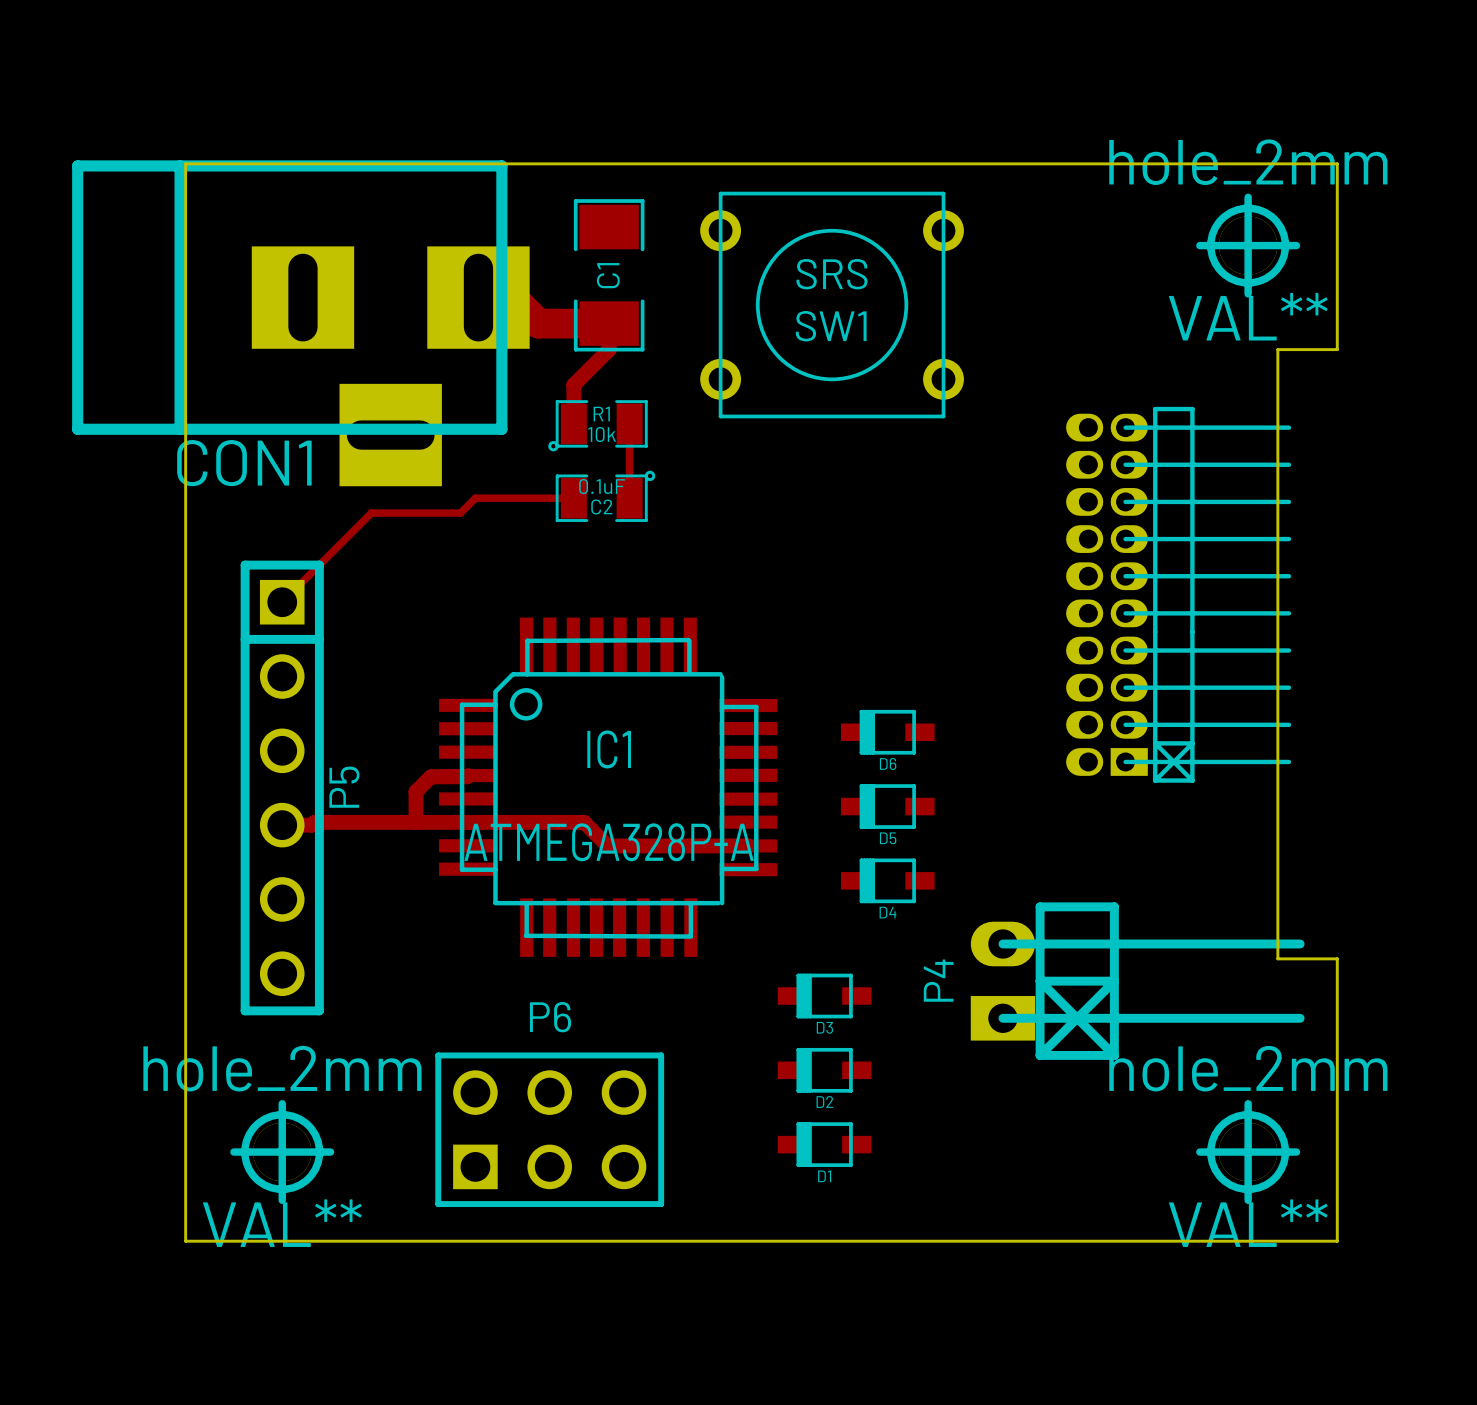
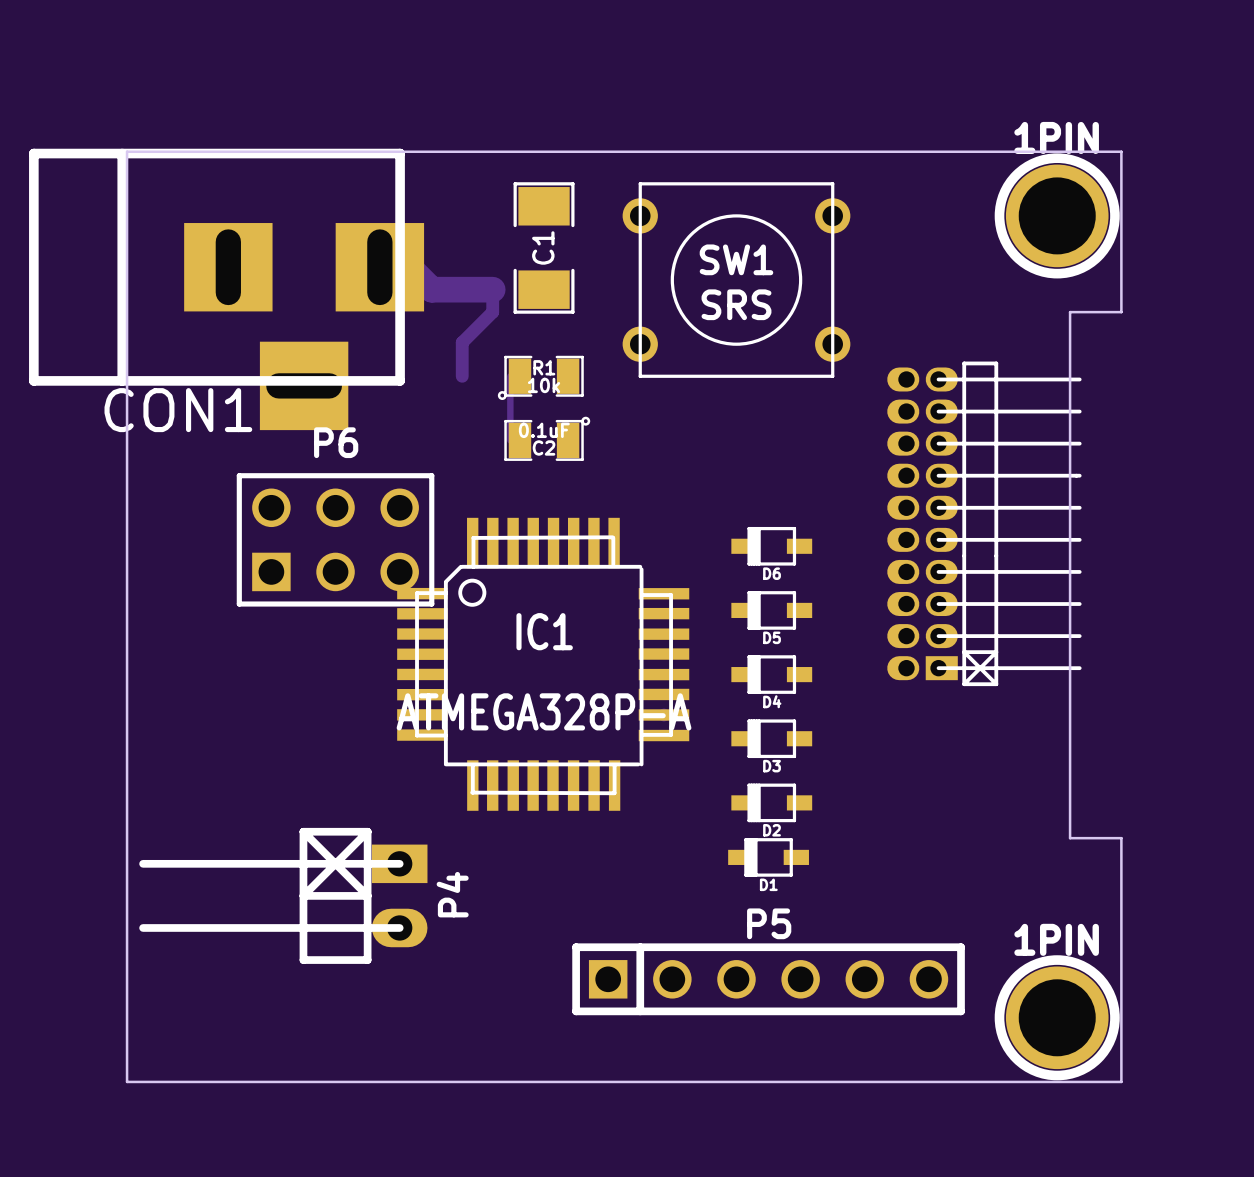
1PIN: none -> (1057, 215)
hole_2mm: VAL** (1248, 245) -> none
SW1 value position: SRS (832, 274) -> SRS (736, 304)
C1 position: (609, 275) -> (544, 247)
SW1 position: (832, 305) -> (736, 280)
SW1 name position: SW1 (831, 326) -> SW1 (736, 259)
R1 position: (598, 425) -> (540, 377)
C2 position: (605, 496) -> (547, 438)
track: (573, 498) (475, 498) (460, 513) (371, 513) (282, 602) -> none
D6 position: (887, 732) -> (771, 546)
track: (468, 775) (430, 776) (415, 791) (415, 822) -> none
P5 rotation: 0° (282, 787) -> 90° counterclockwise (768, 979)
P5 position: (282, 787) -> (768, 979)
IC1 position: (608, 787) -> (543, 664)
D5 position: (887, 806) -> (771, 610)
track: (282, 825) (311, 825) (314, 822) (584, 822) (607, 845) (748, 845) -> none
D4 position: (887, 880) -> (771, 674)
P4 rotation: 0° (1137, 981) -> 180° (283, 895)
P4 position: (1137, 981) -> (283, 895)
D3 position: (824, 996) -> (771, 738)
D2 position: (824, 1070) -> (771, 802)
P6 position: (549, 1129) -> (335, 539)
D1 position: (824, 1144) -> (768, 857)
hole_2mm: VAL** (282, 1152) -> none
hole_2mm: VAL** (1248, 1152) -> none
1PIN: none -> (1057, 1017)

